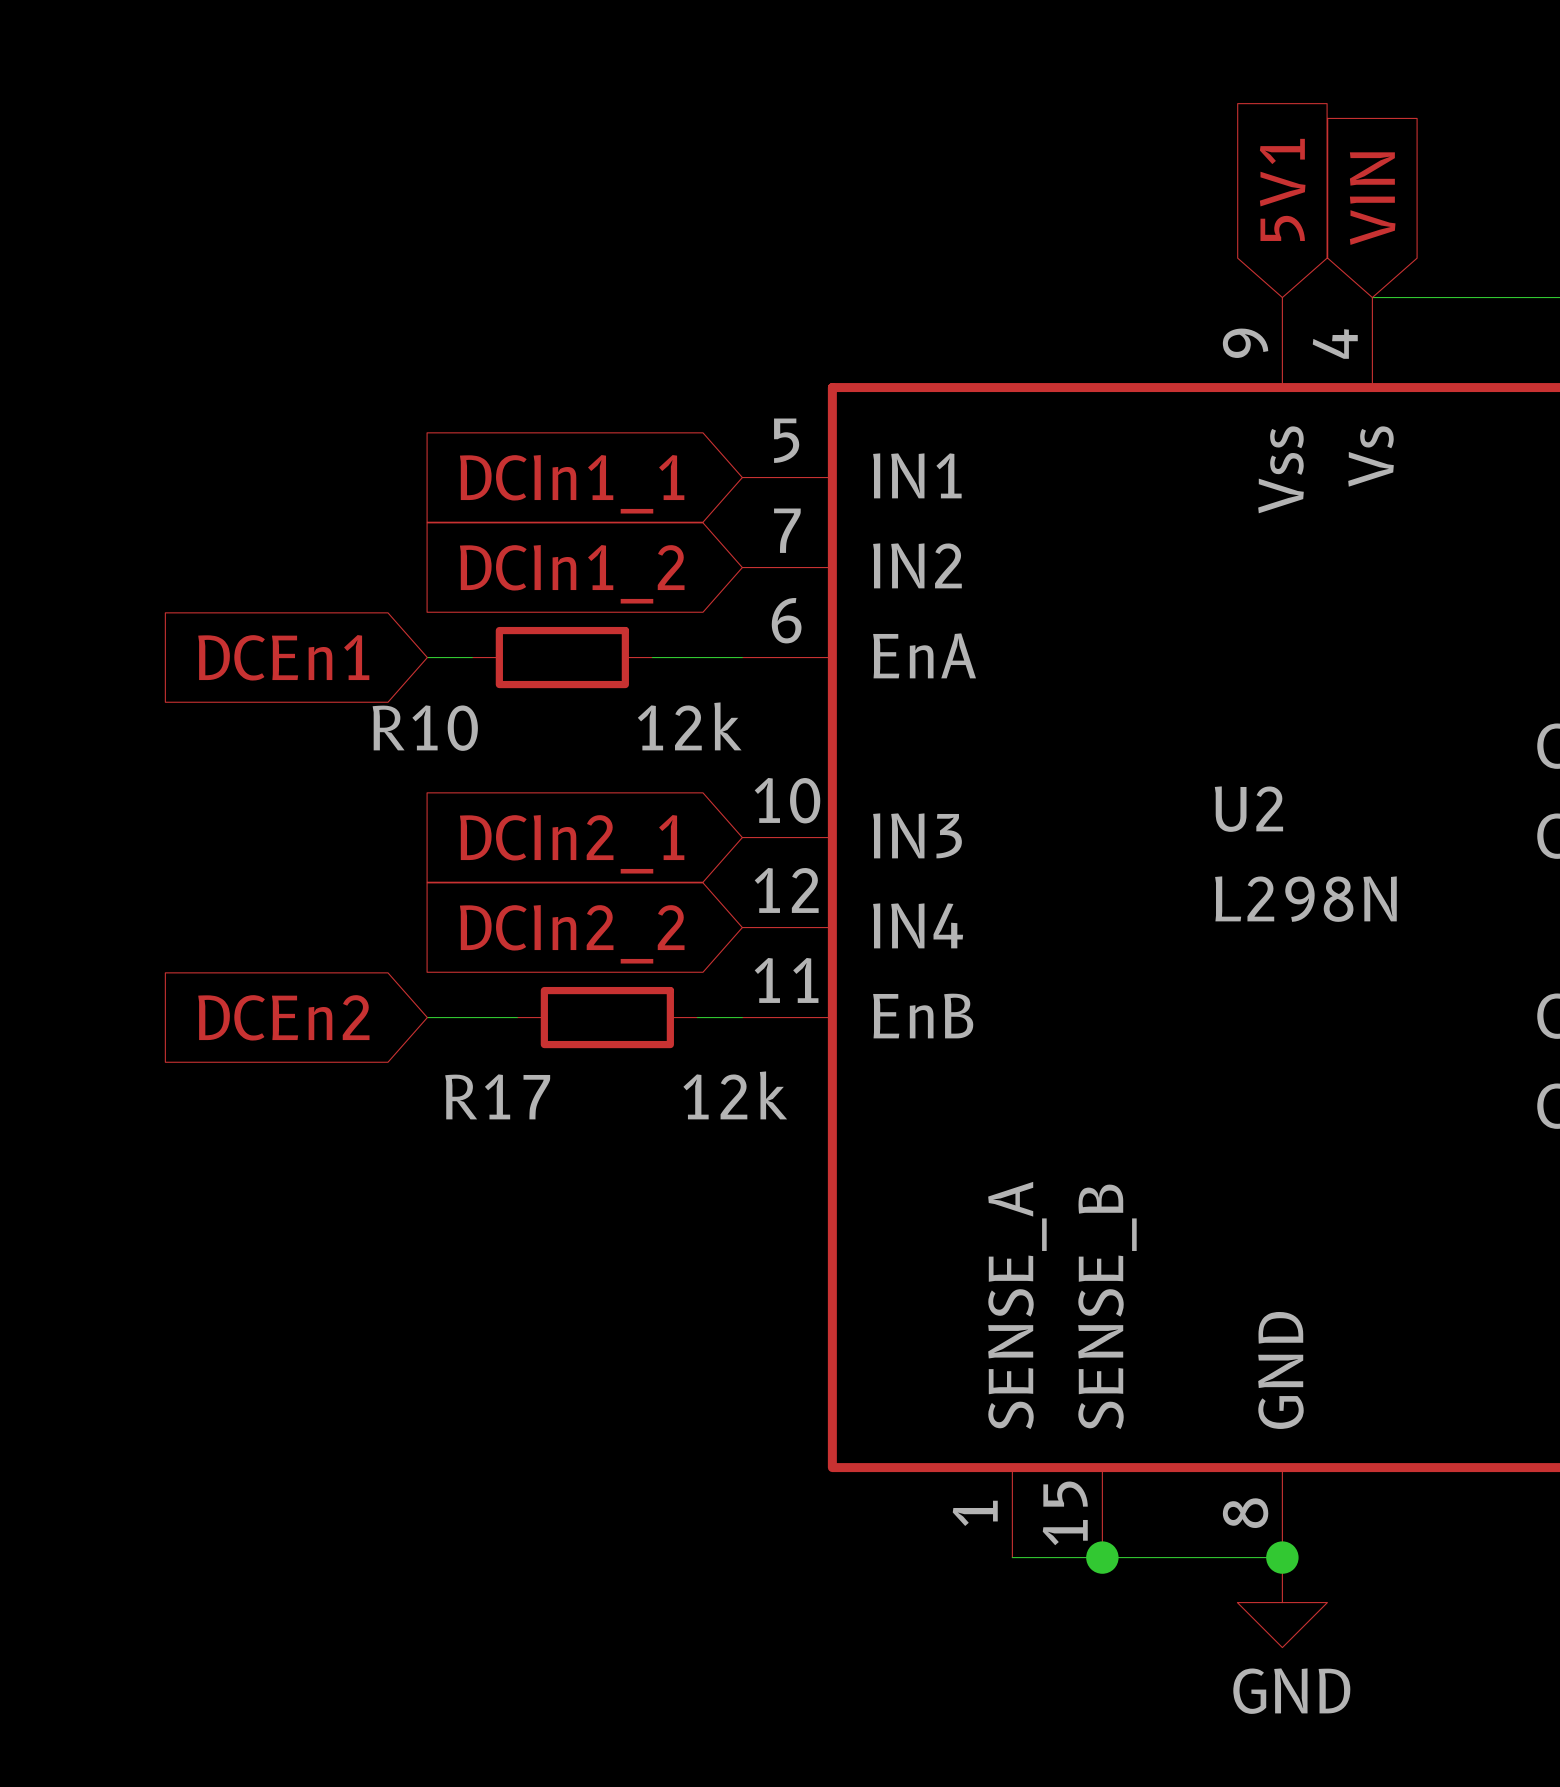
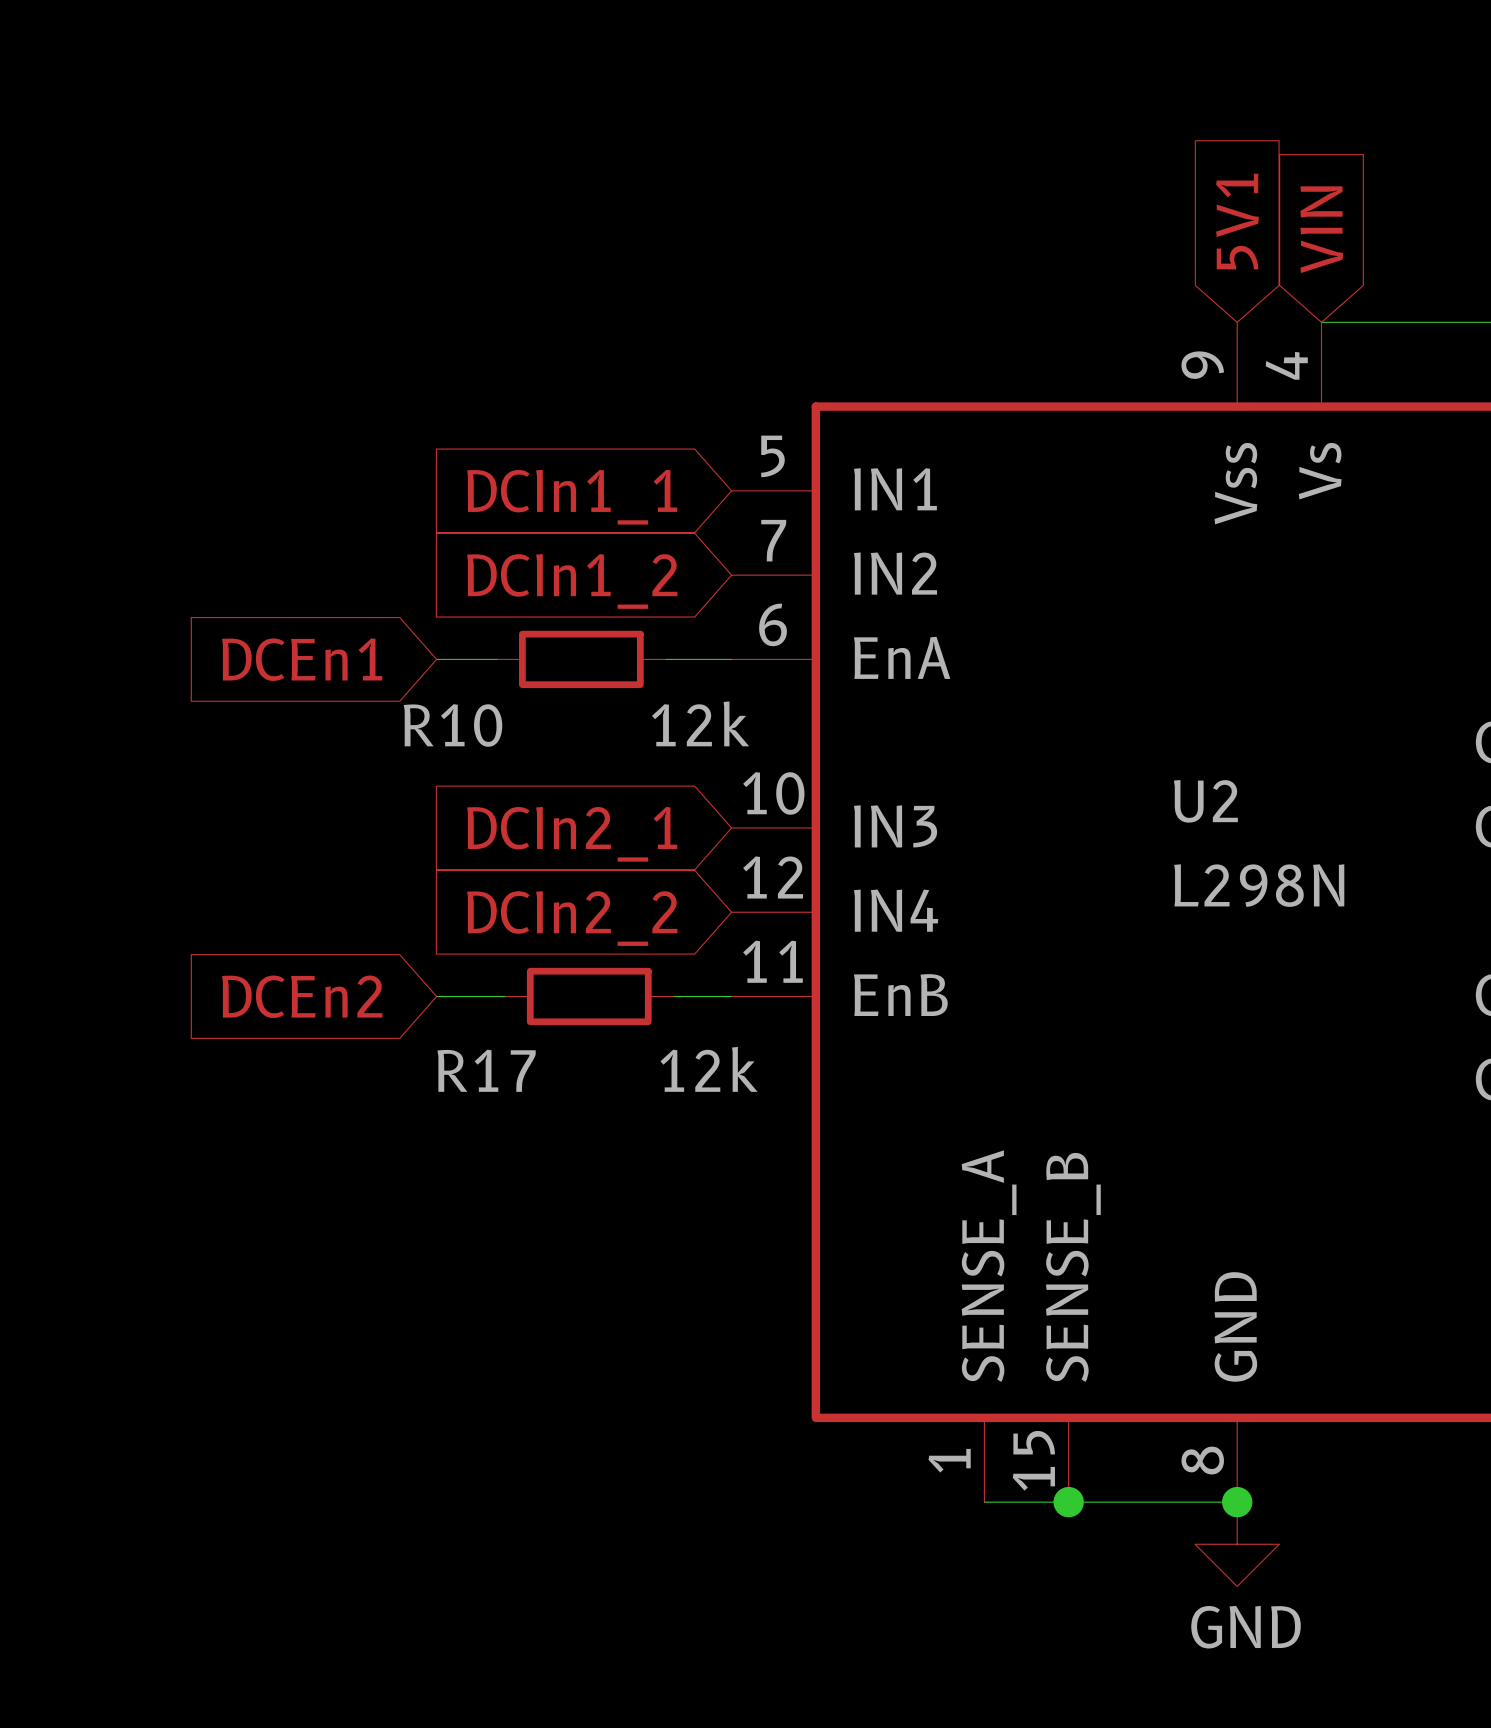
R10 position: (562, 657) -> (581, 659)
R17 position: (607, 1017) -> (589, 996)

